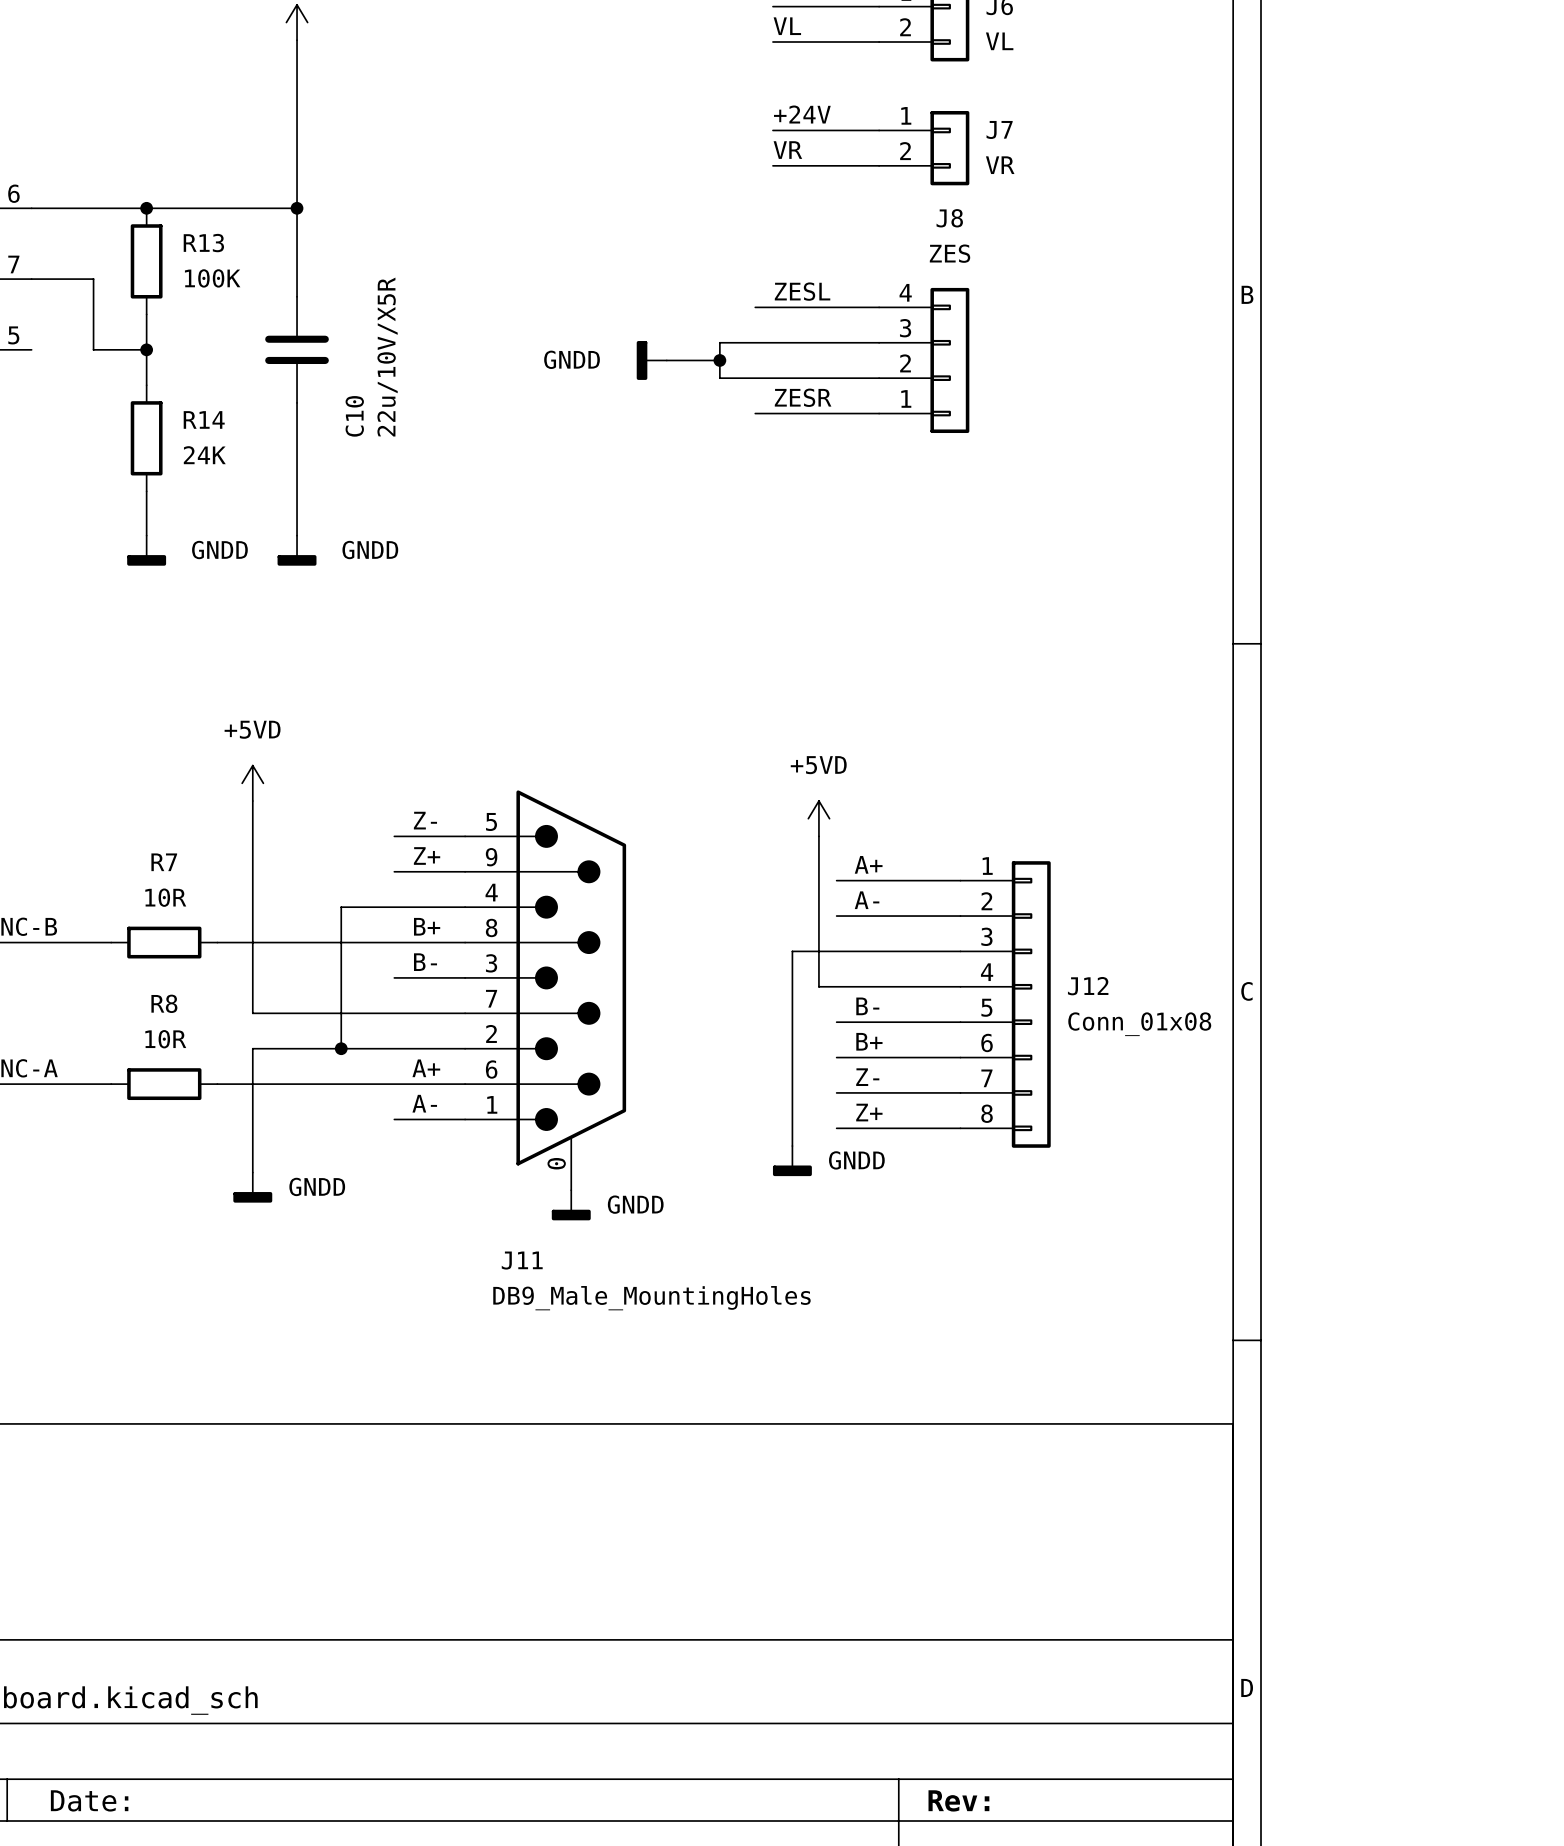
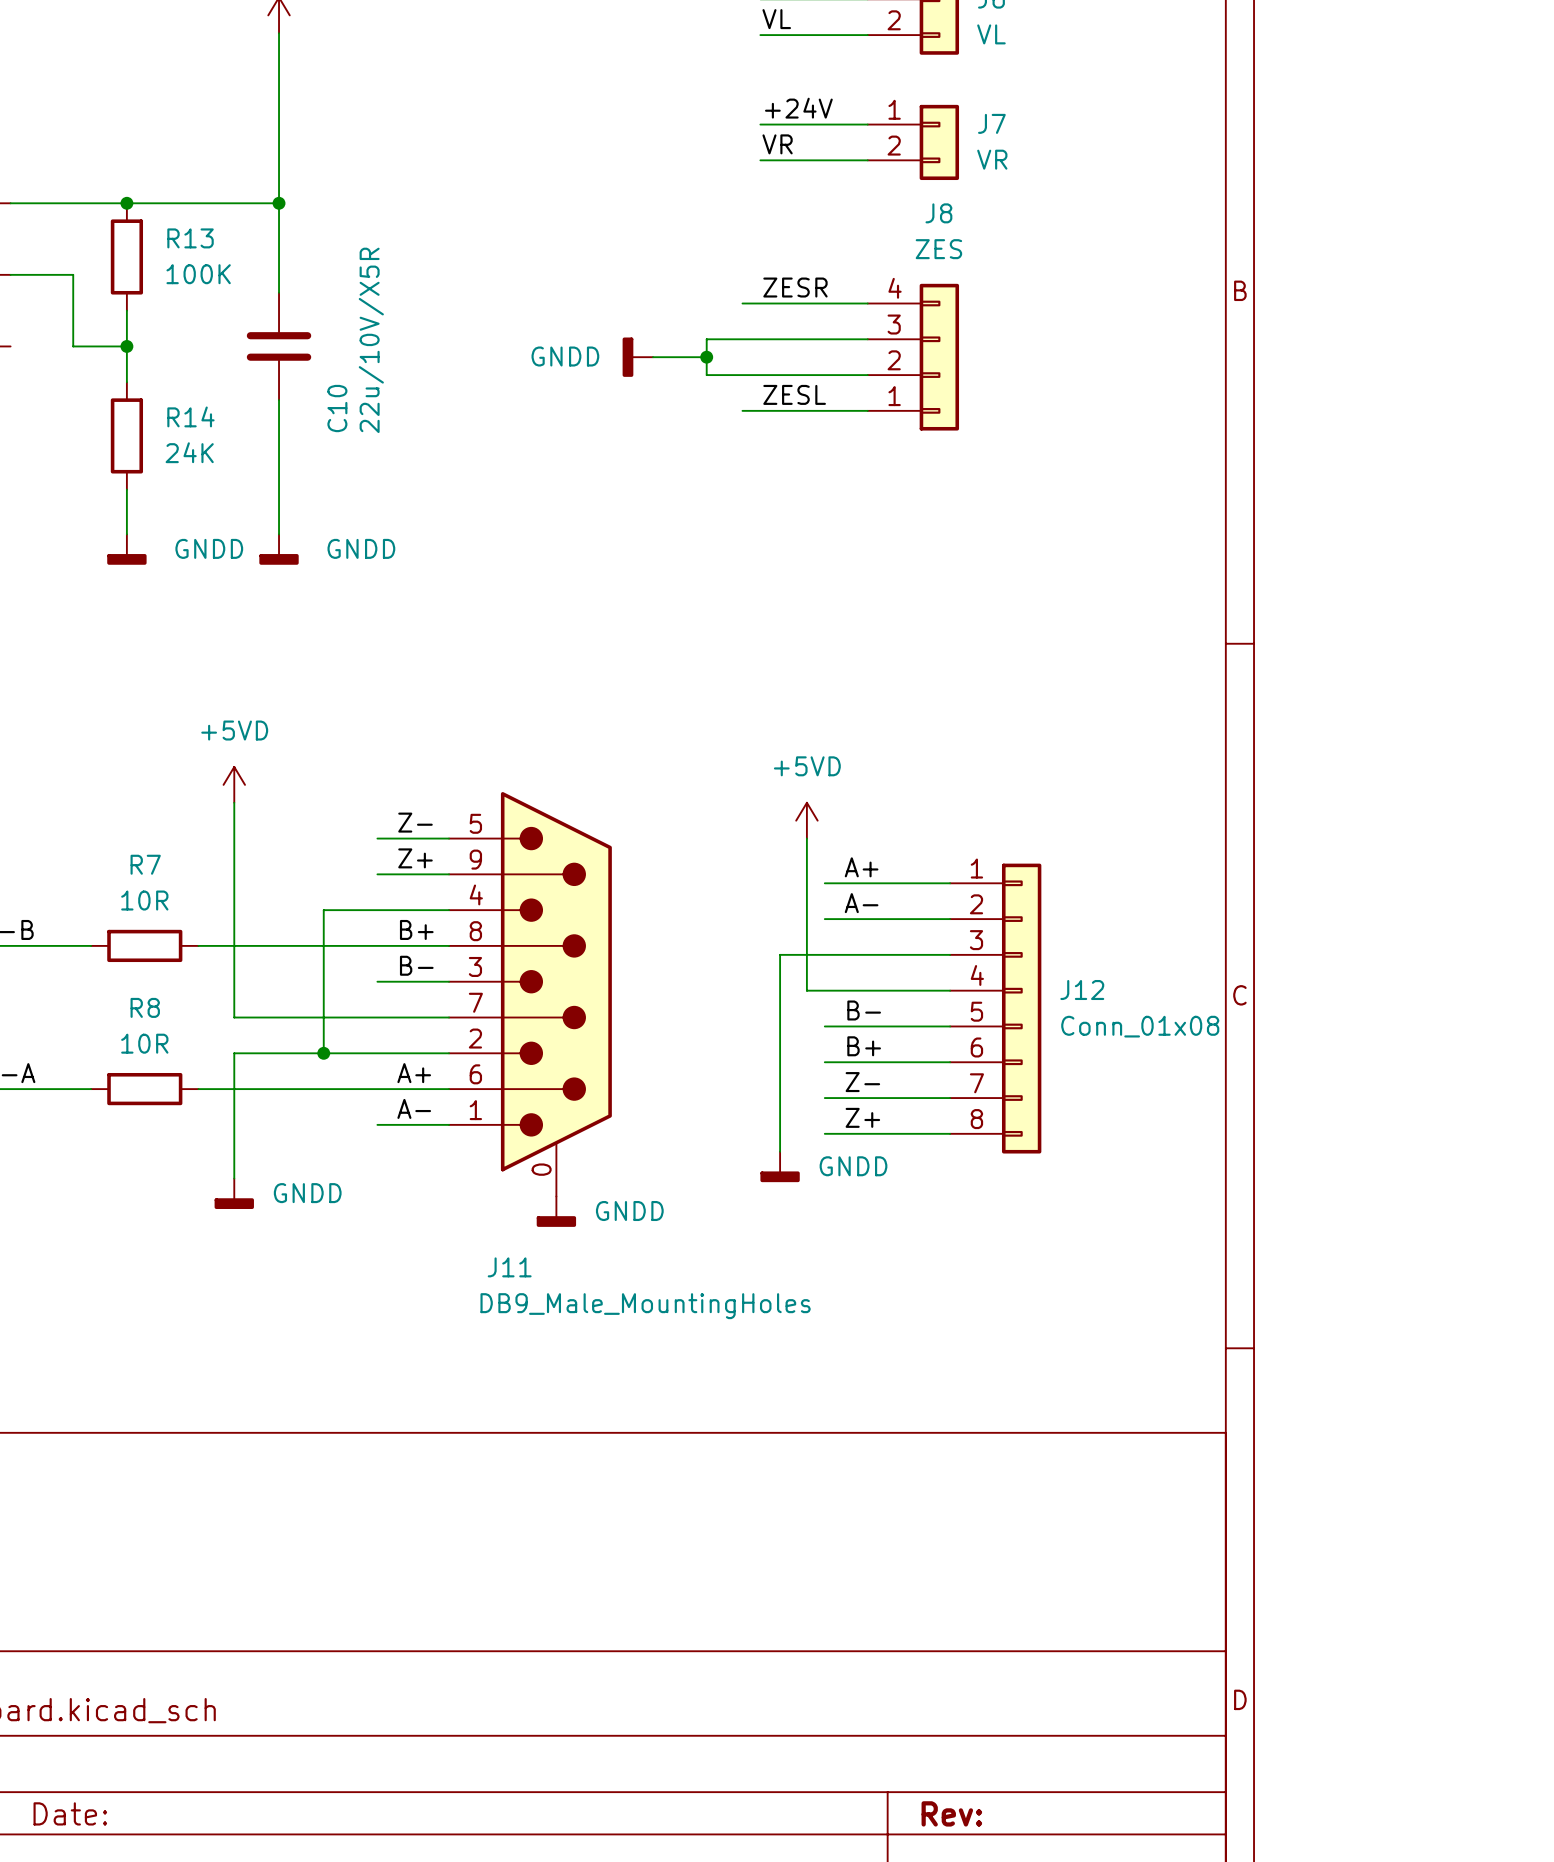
label: ZESL (802, 291) -> ZESR (795, 287)
label: ZESR (803, 397) -> ZESL (794, 394)

